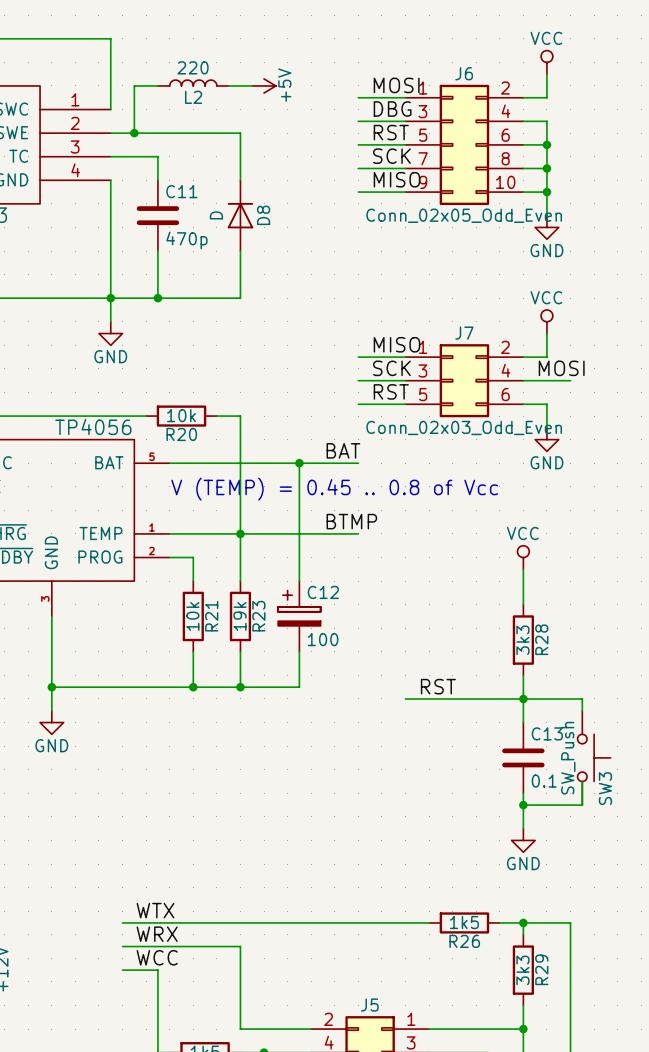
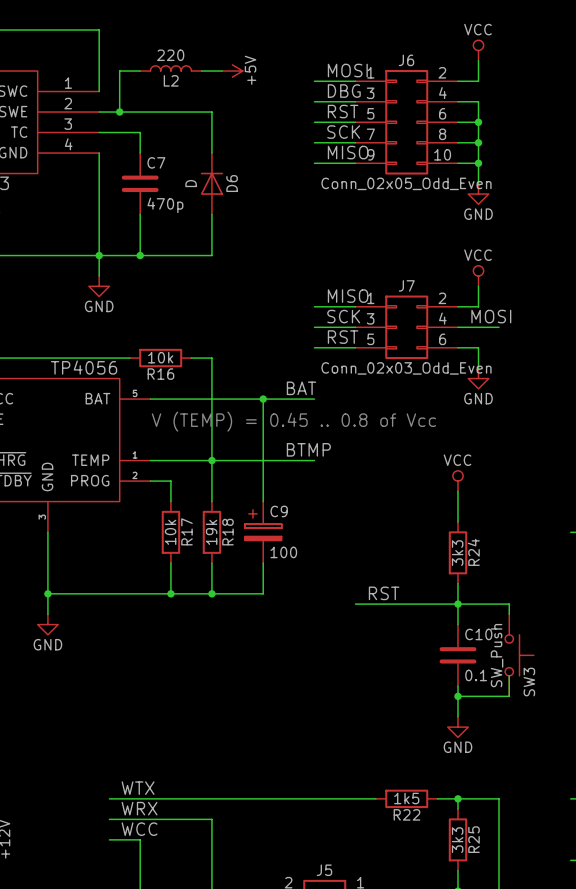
C11 name: C11 (181, 191) -> C7 (156, 162)
D8 name: D8 (263, 215) -> D6 (232, 183)
R20 name: R20 (181, 434) -> R16 (160, 374)
C12 name: C12 (323, 592) -> C9 (279, 511)
R21 name: R21 (211, 616) -> R17 (186, 531)
R23 name: R23 (258, 616) -> R18 (227, 532)
R28 name: R28 (541, 639) -> R24 (473, 552)
C13 name: C13 (547, 733) -> C10 (478, 634)
R26 name: R26 (464, 941) -> R22 (406, 814)
R29 name: R29 (541, 969) -> R25 (474, 839)

